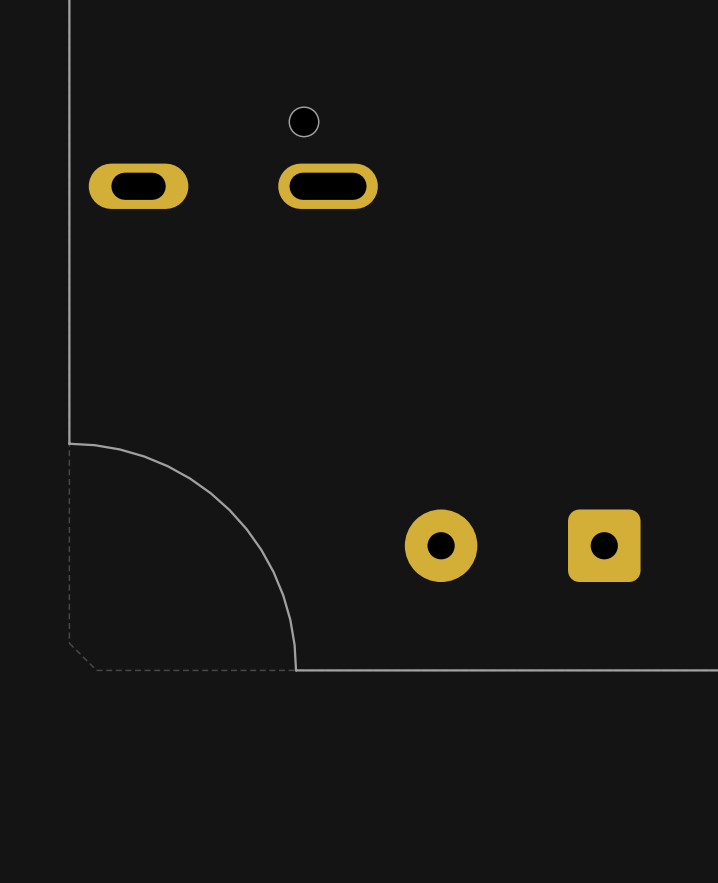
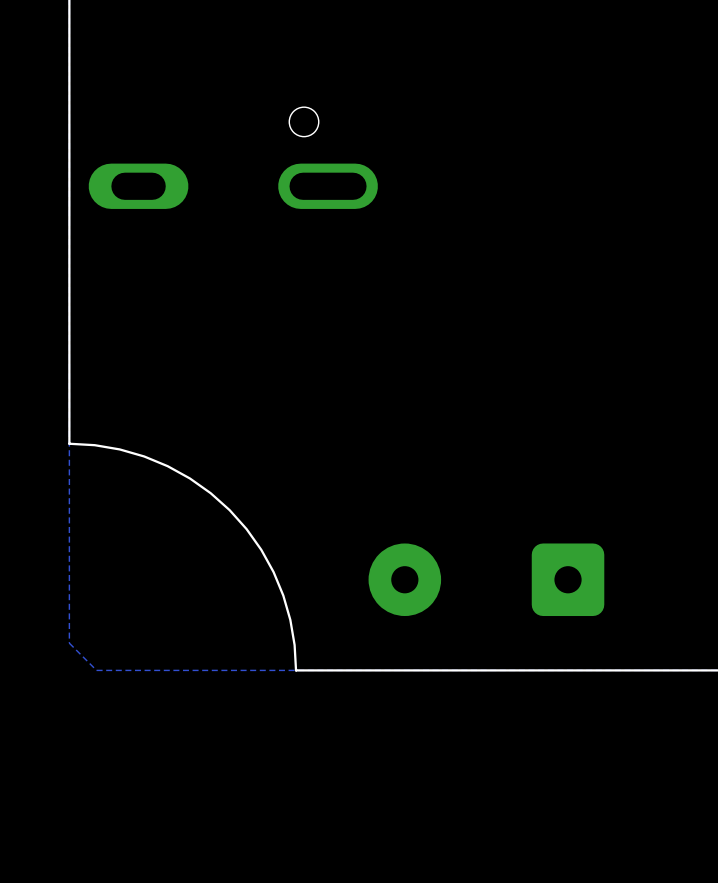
part position: (522, 545) -> (486, 579)

